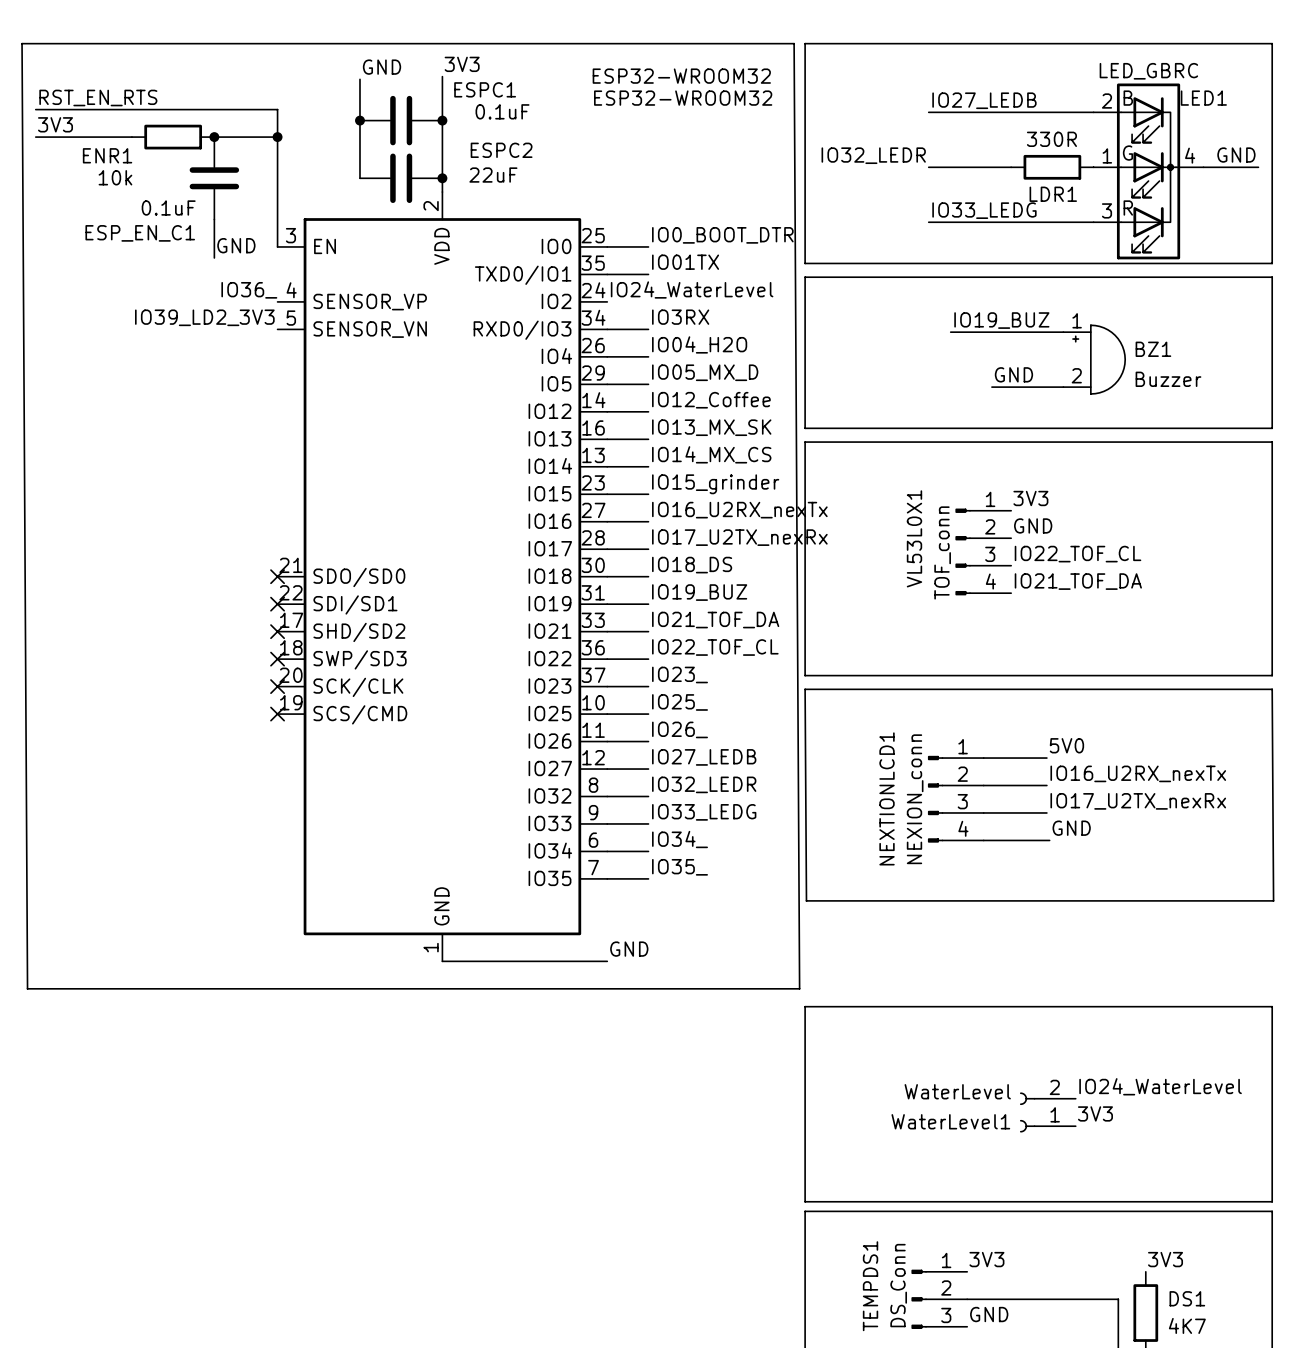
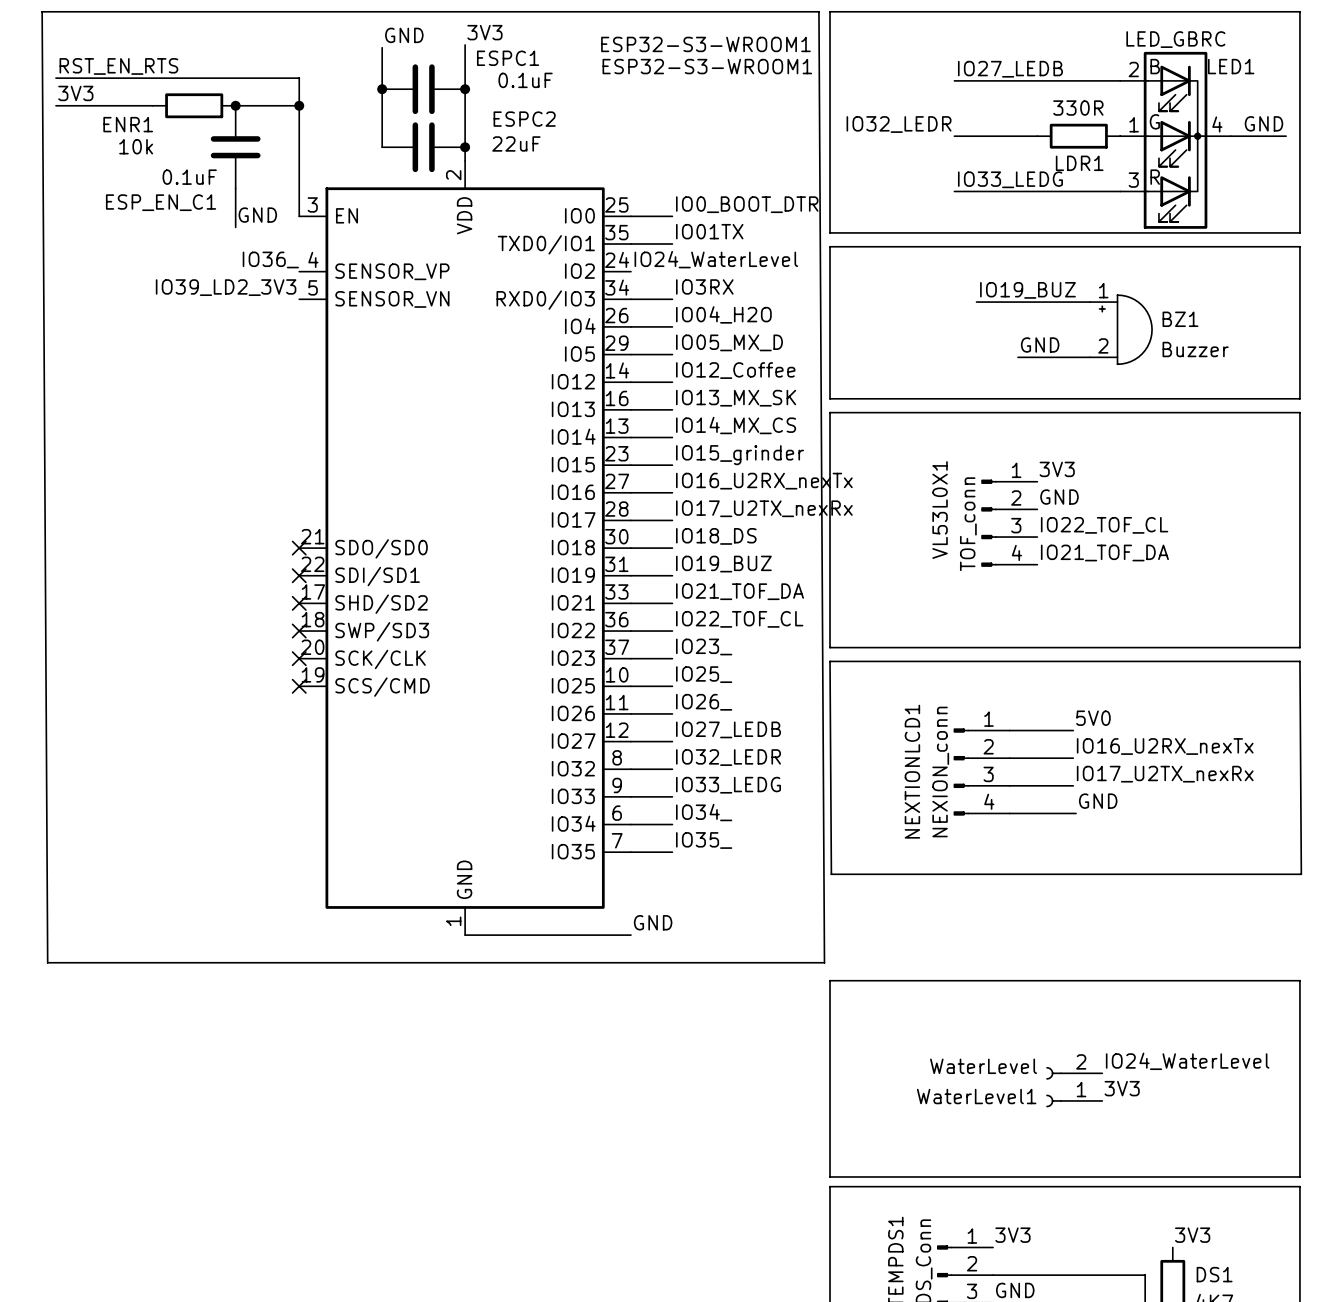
ESP32-WROOM32 name: ESP32-WROOM32 (681, 76) -> ESP32-S3-WROOM1 (705, 44)
ESP32-WROOM32 value: ESP32-WROOM32 (683, 98) -> ESP32-S3-WROOM1 (707, 66)

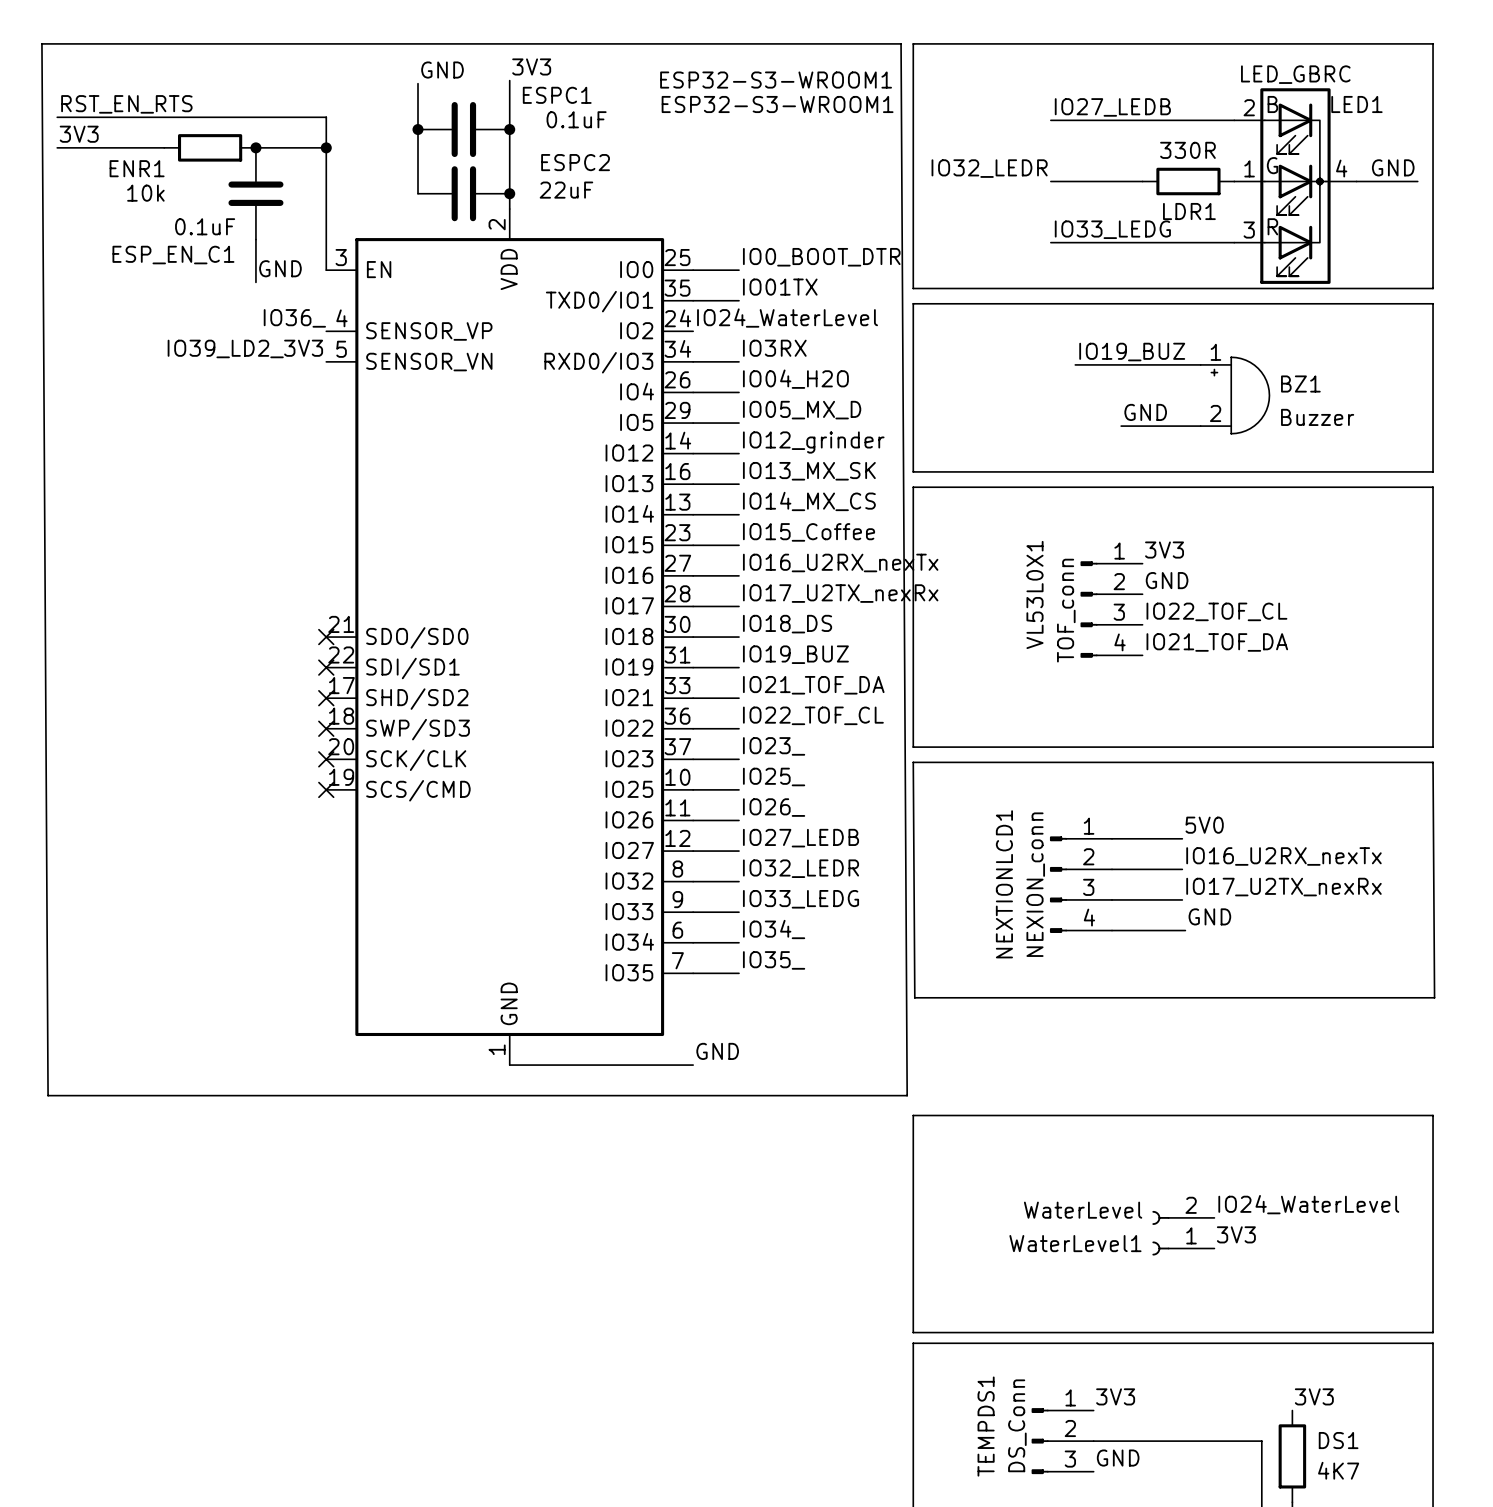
label: IO12_Coffee (735, 370) -> IO12_grinder (813, 442)
label: IO15_grinder (740, 455) -> IO15_Coffee (809, 532)

